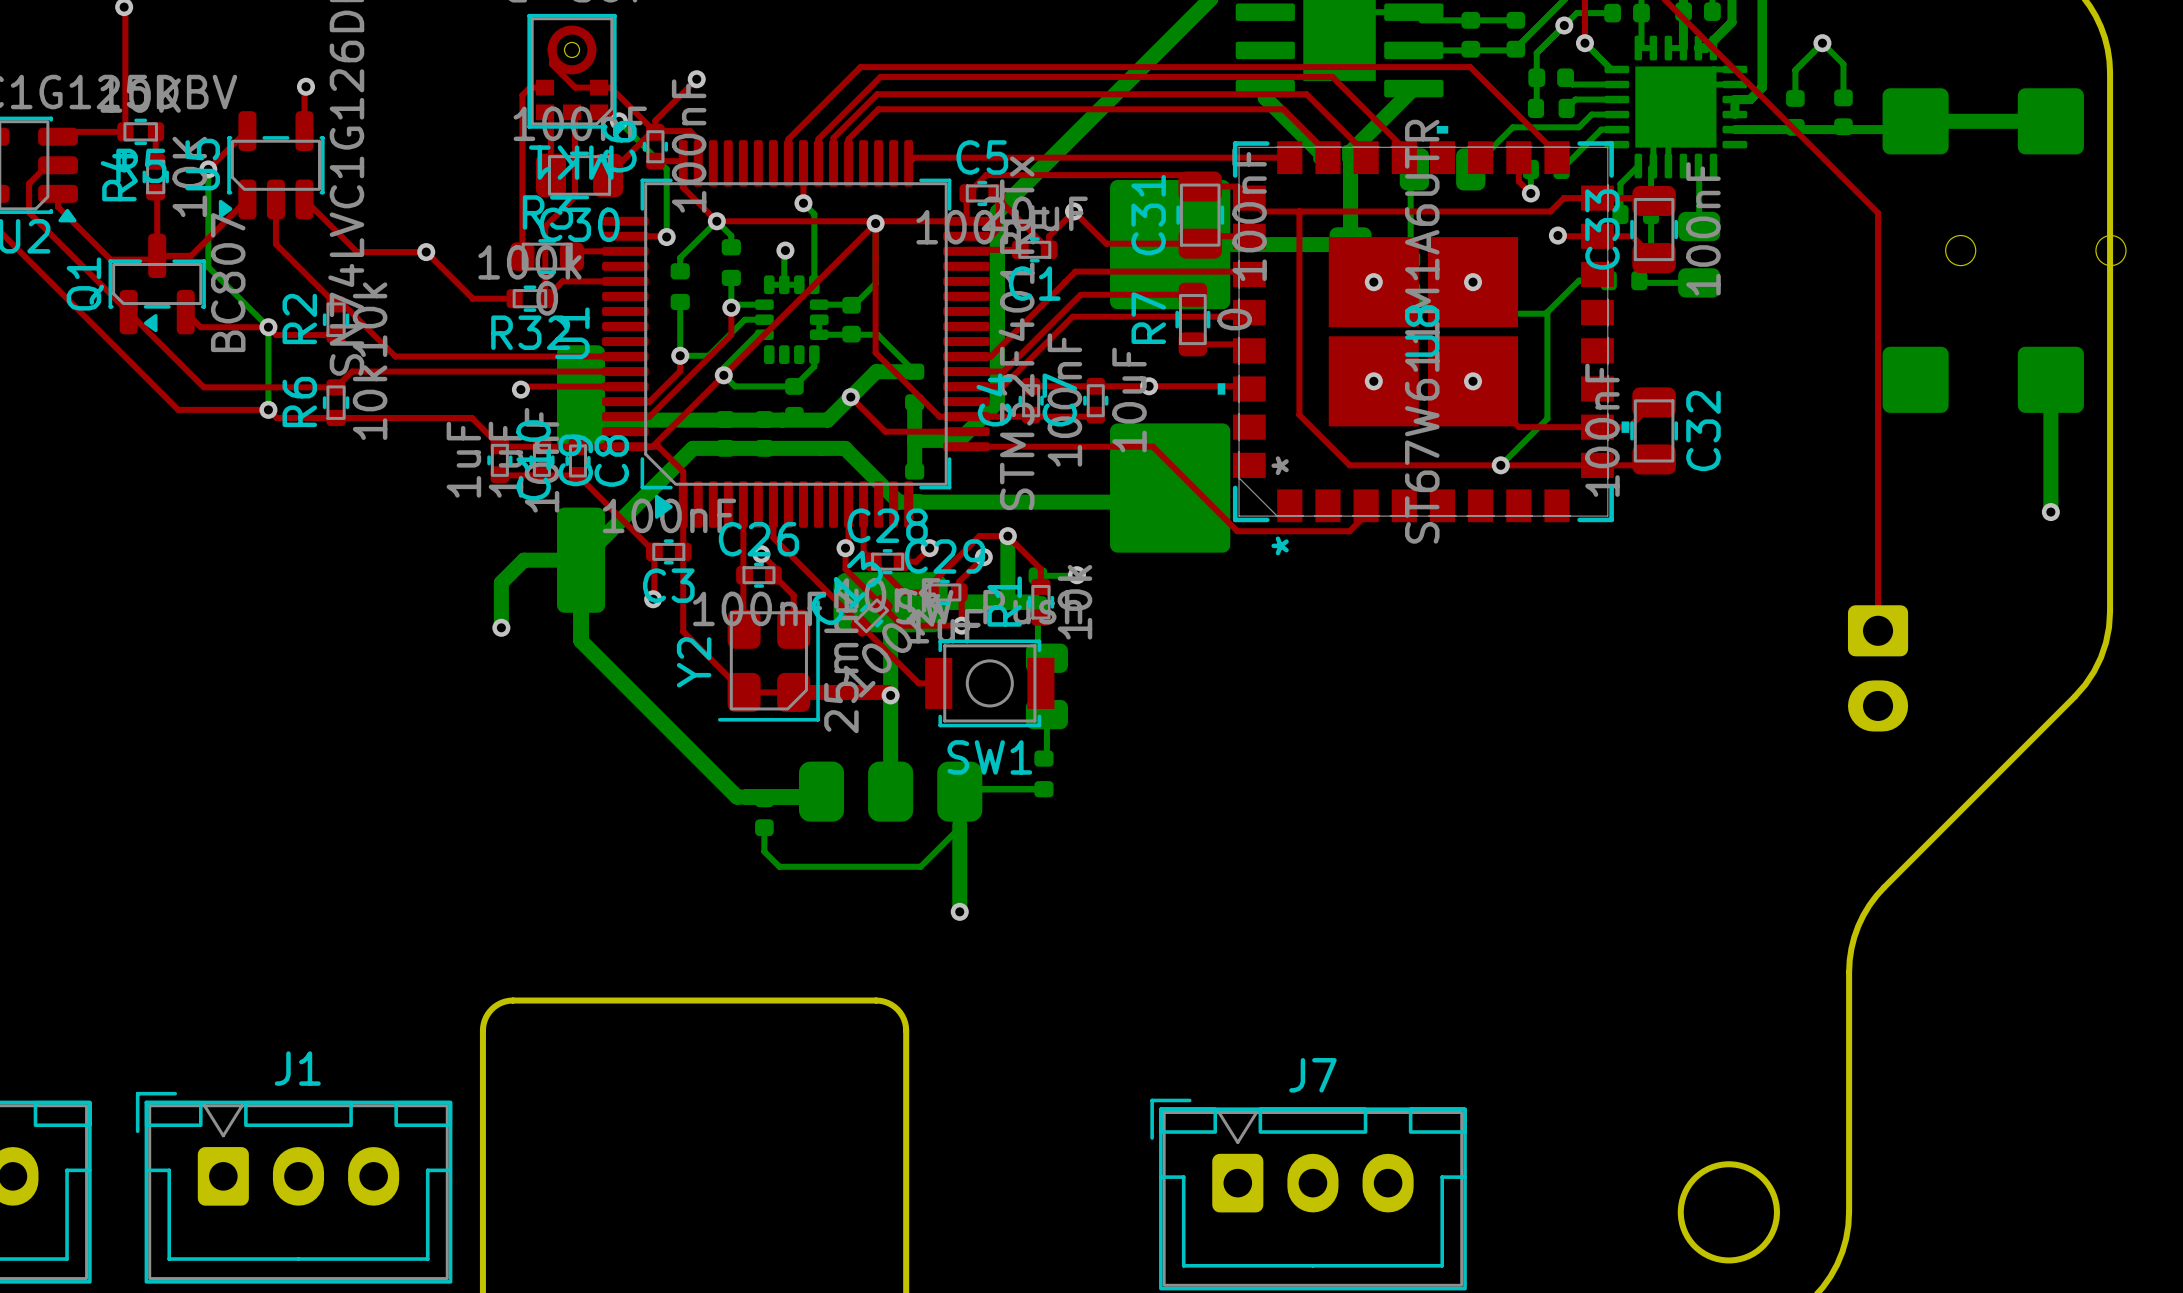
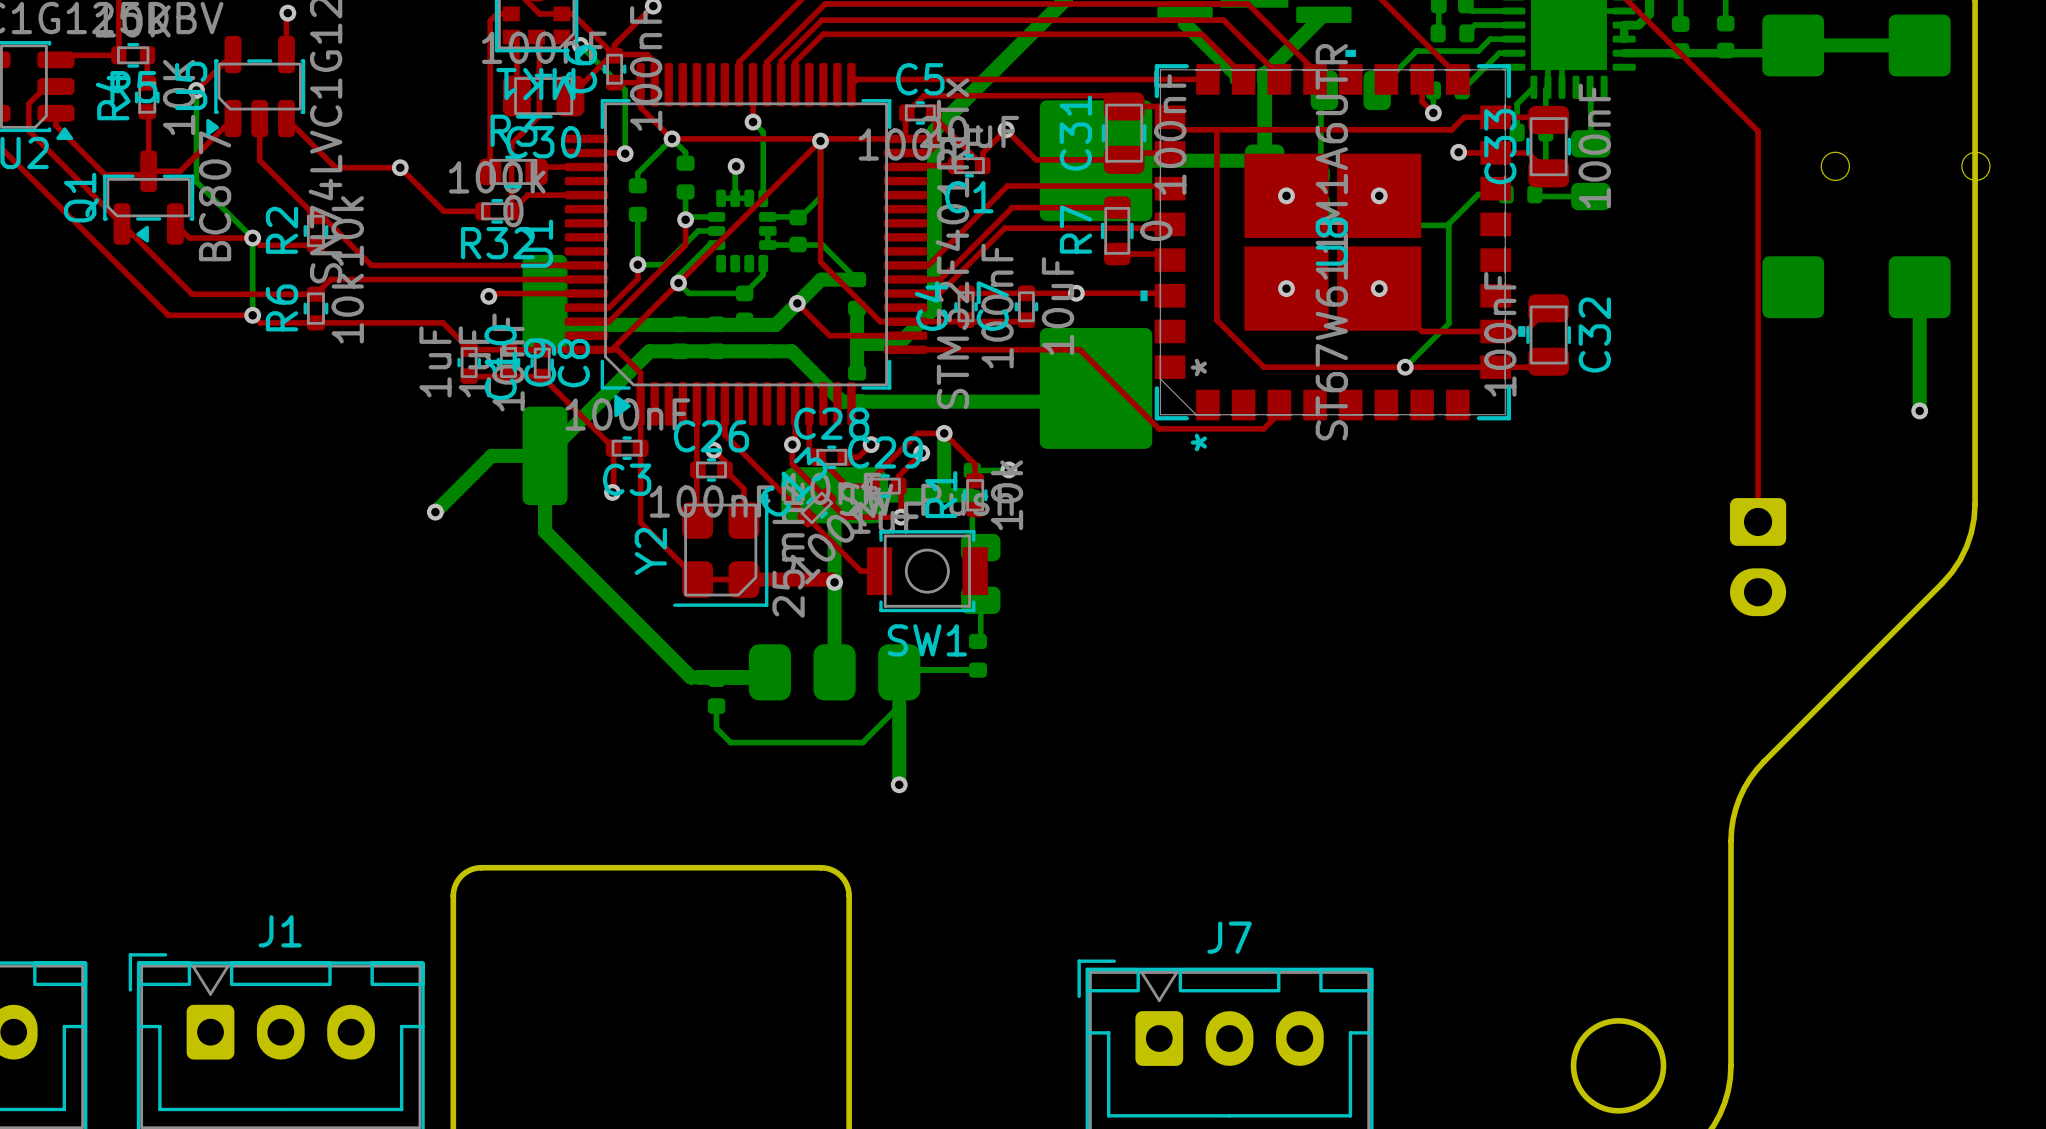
bottom track: (501, 582) (501, 627) -> (470, 476) (435, 512)
via position: (501, 627) -> (435, 512)

